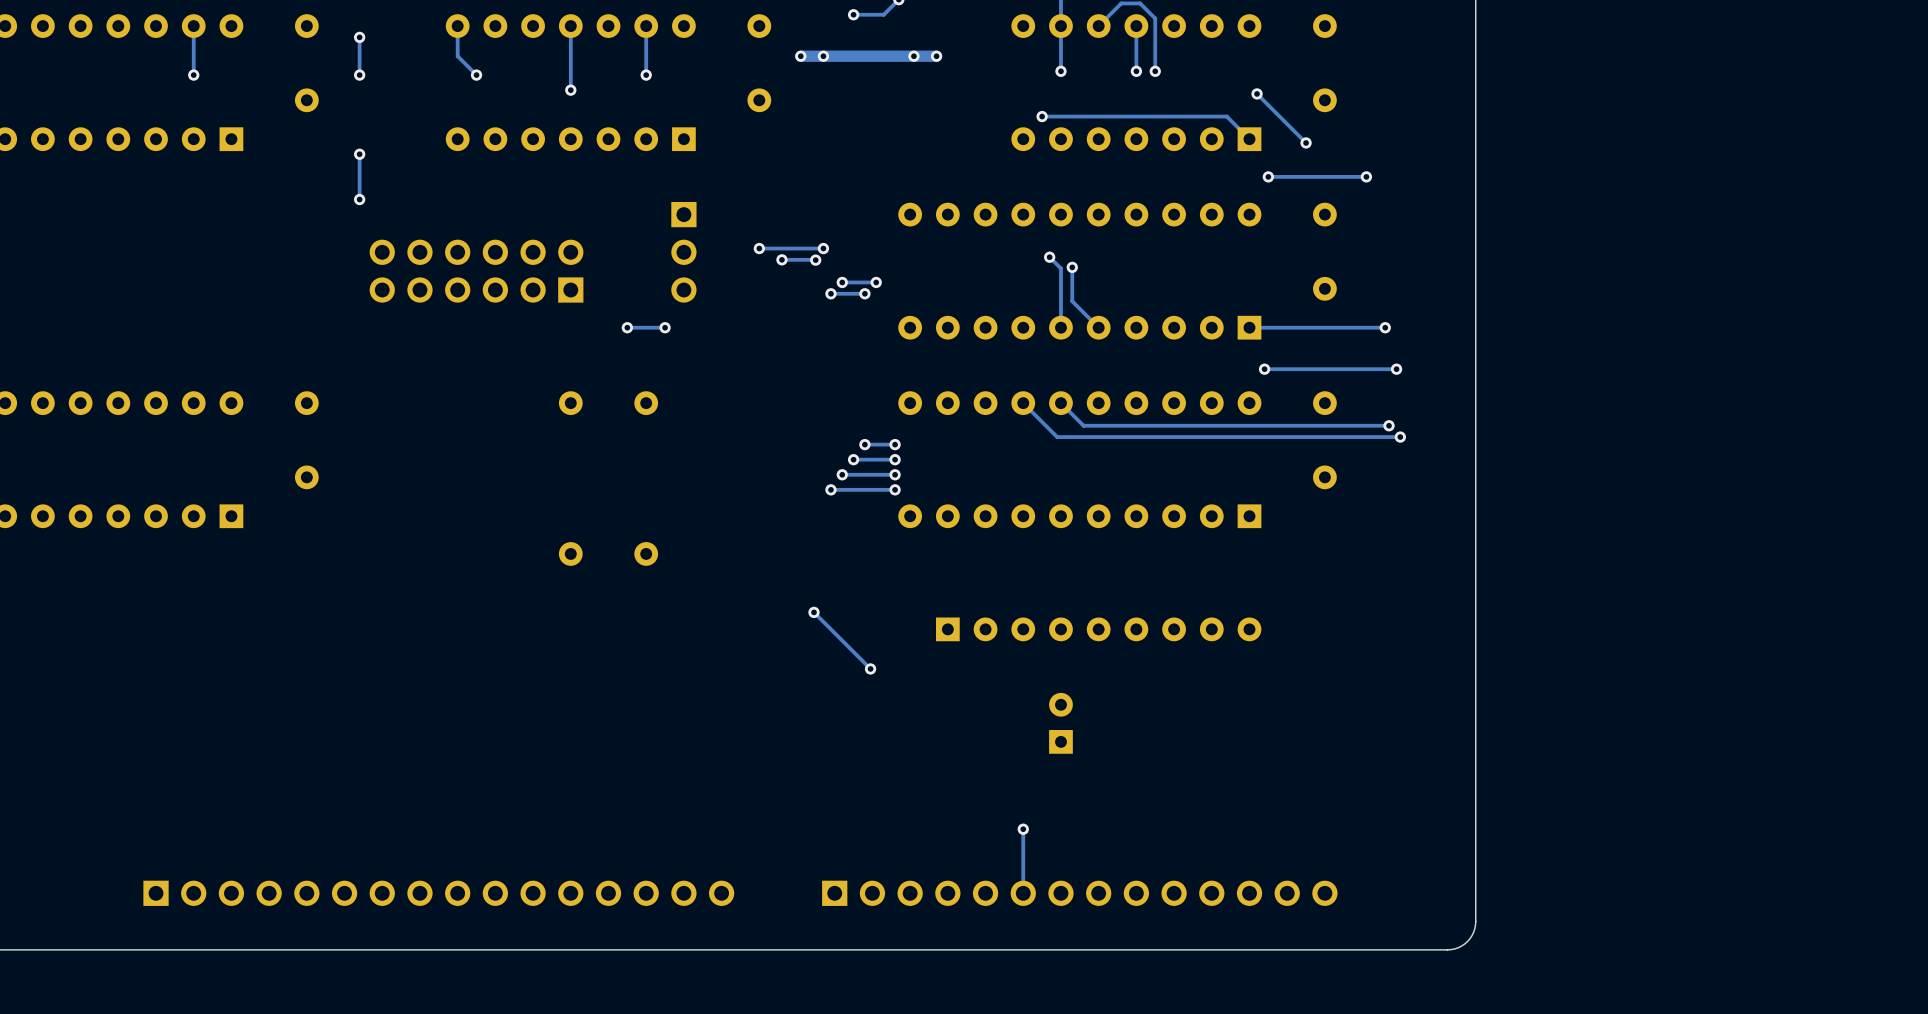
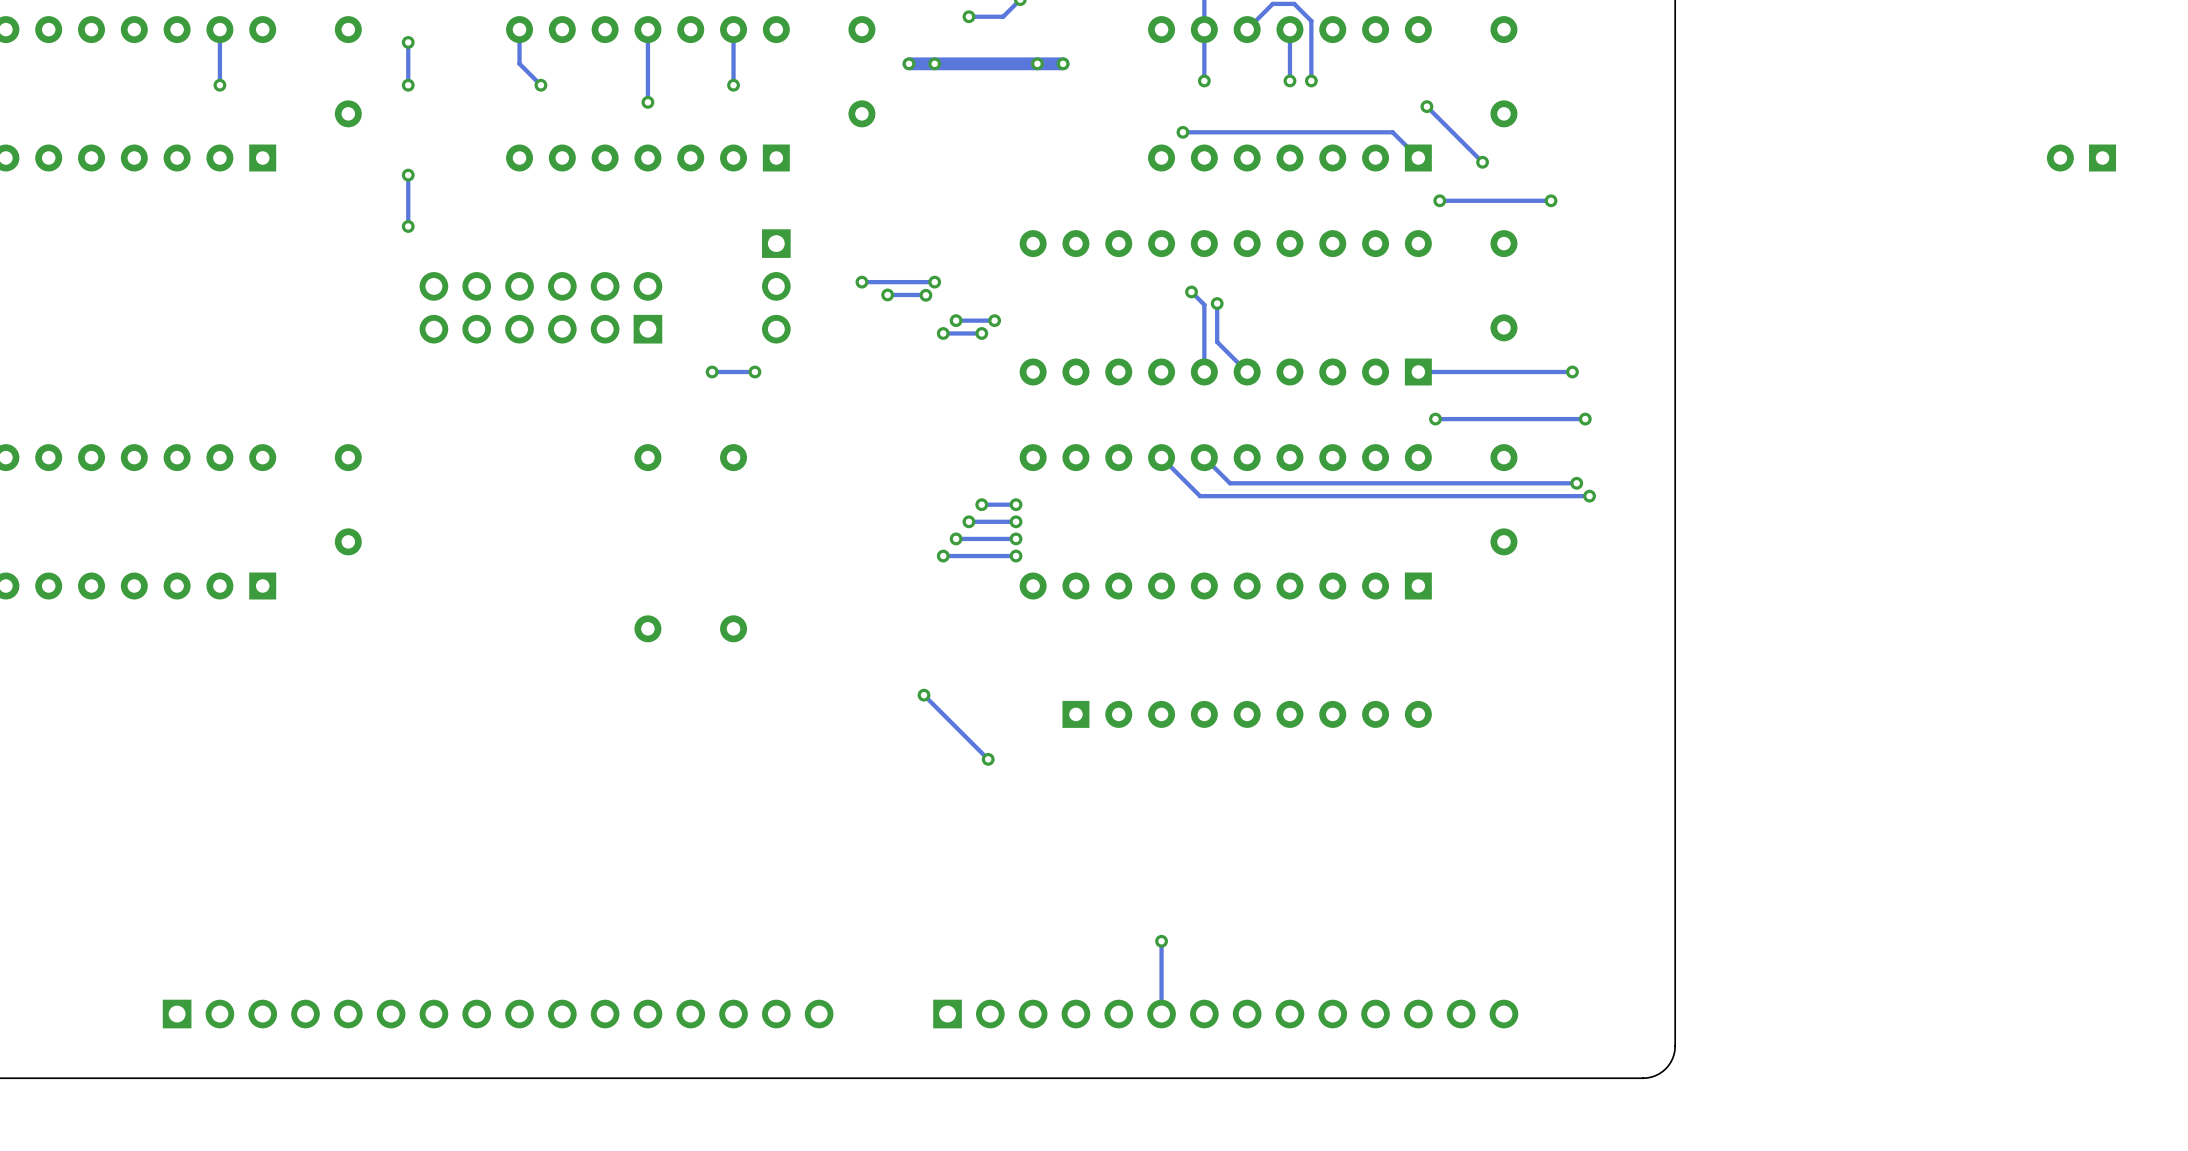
part: none -> (2081, 157)
part: (1060, 723) -> none

